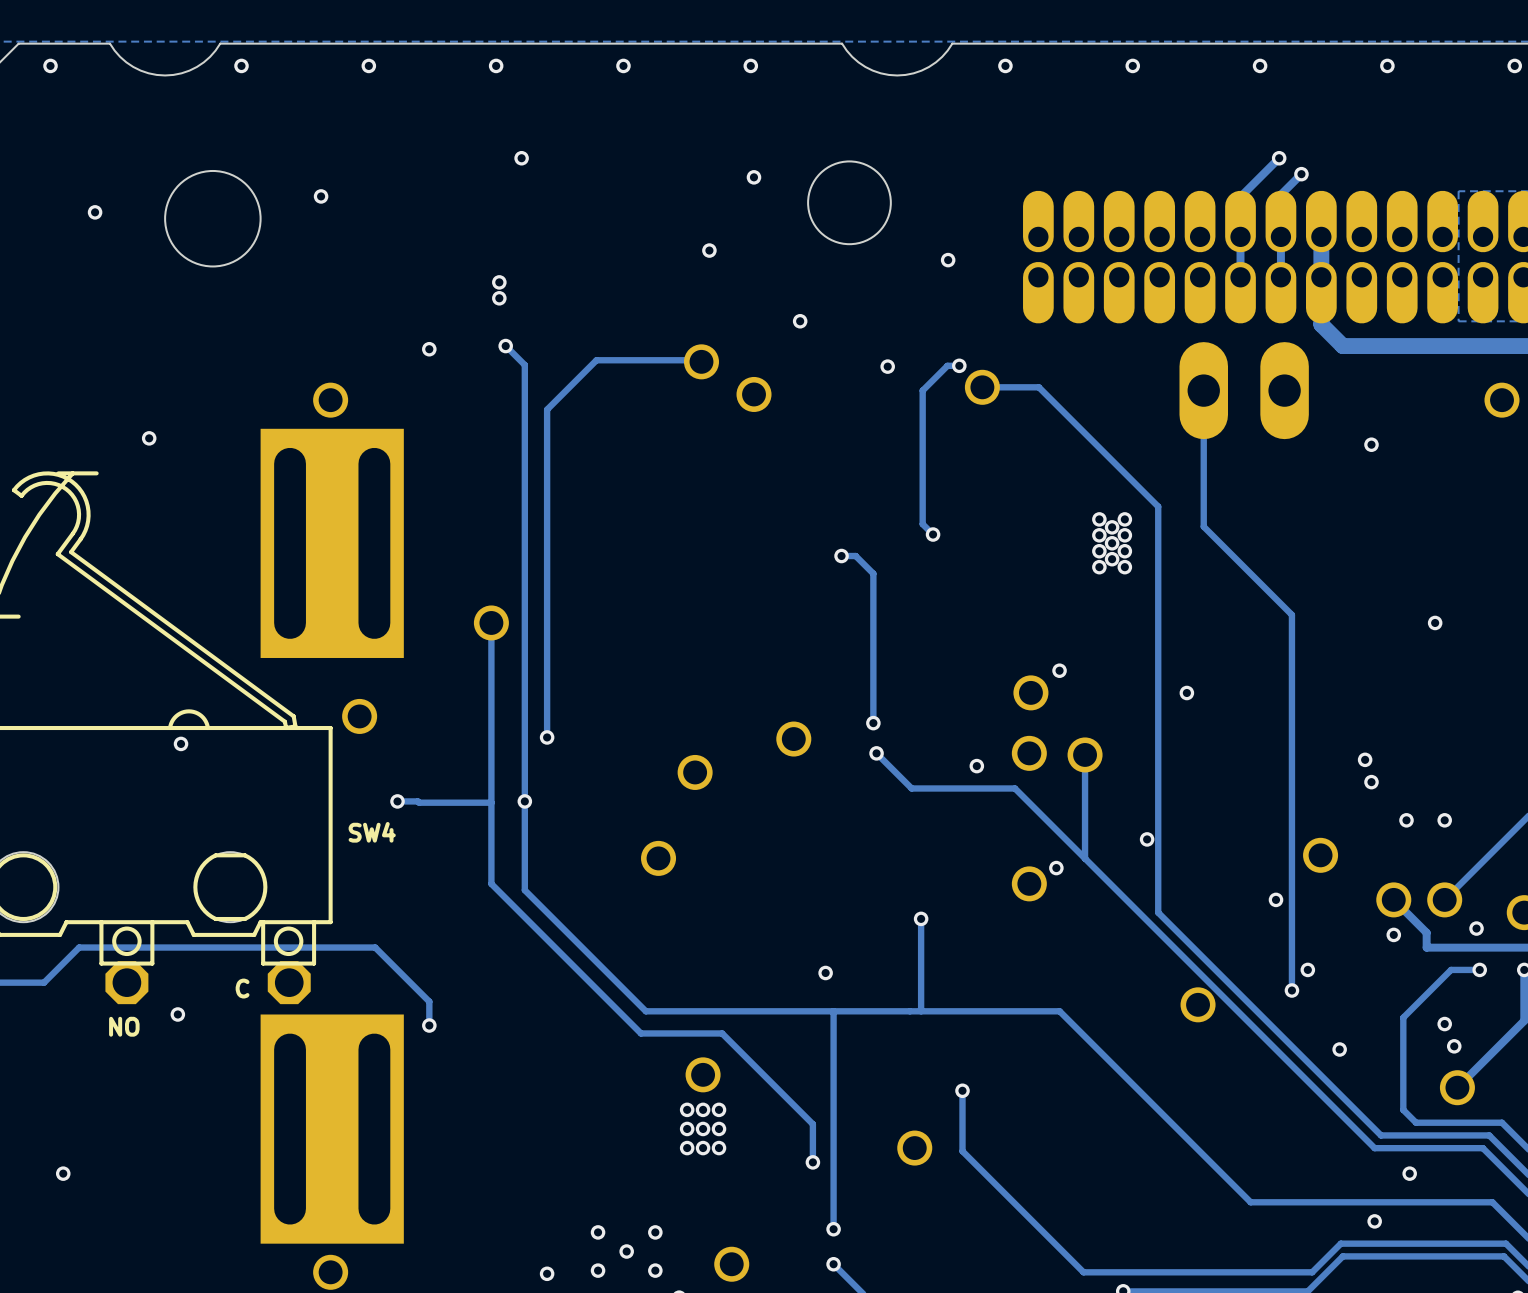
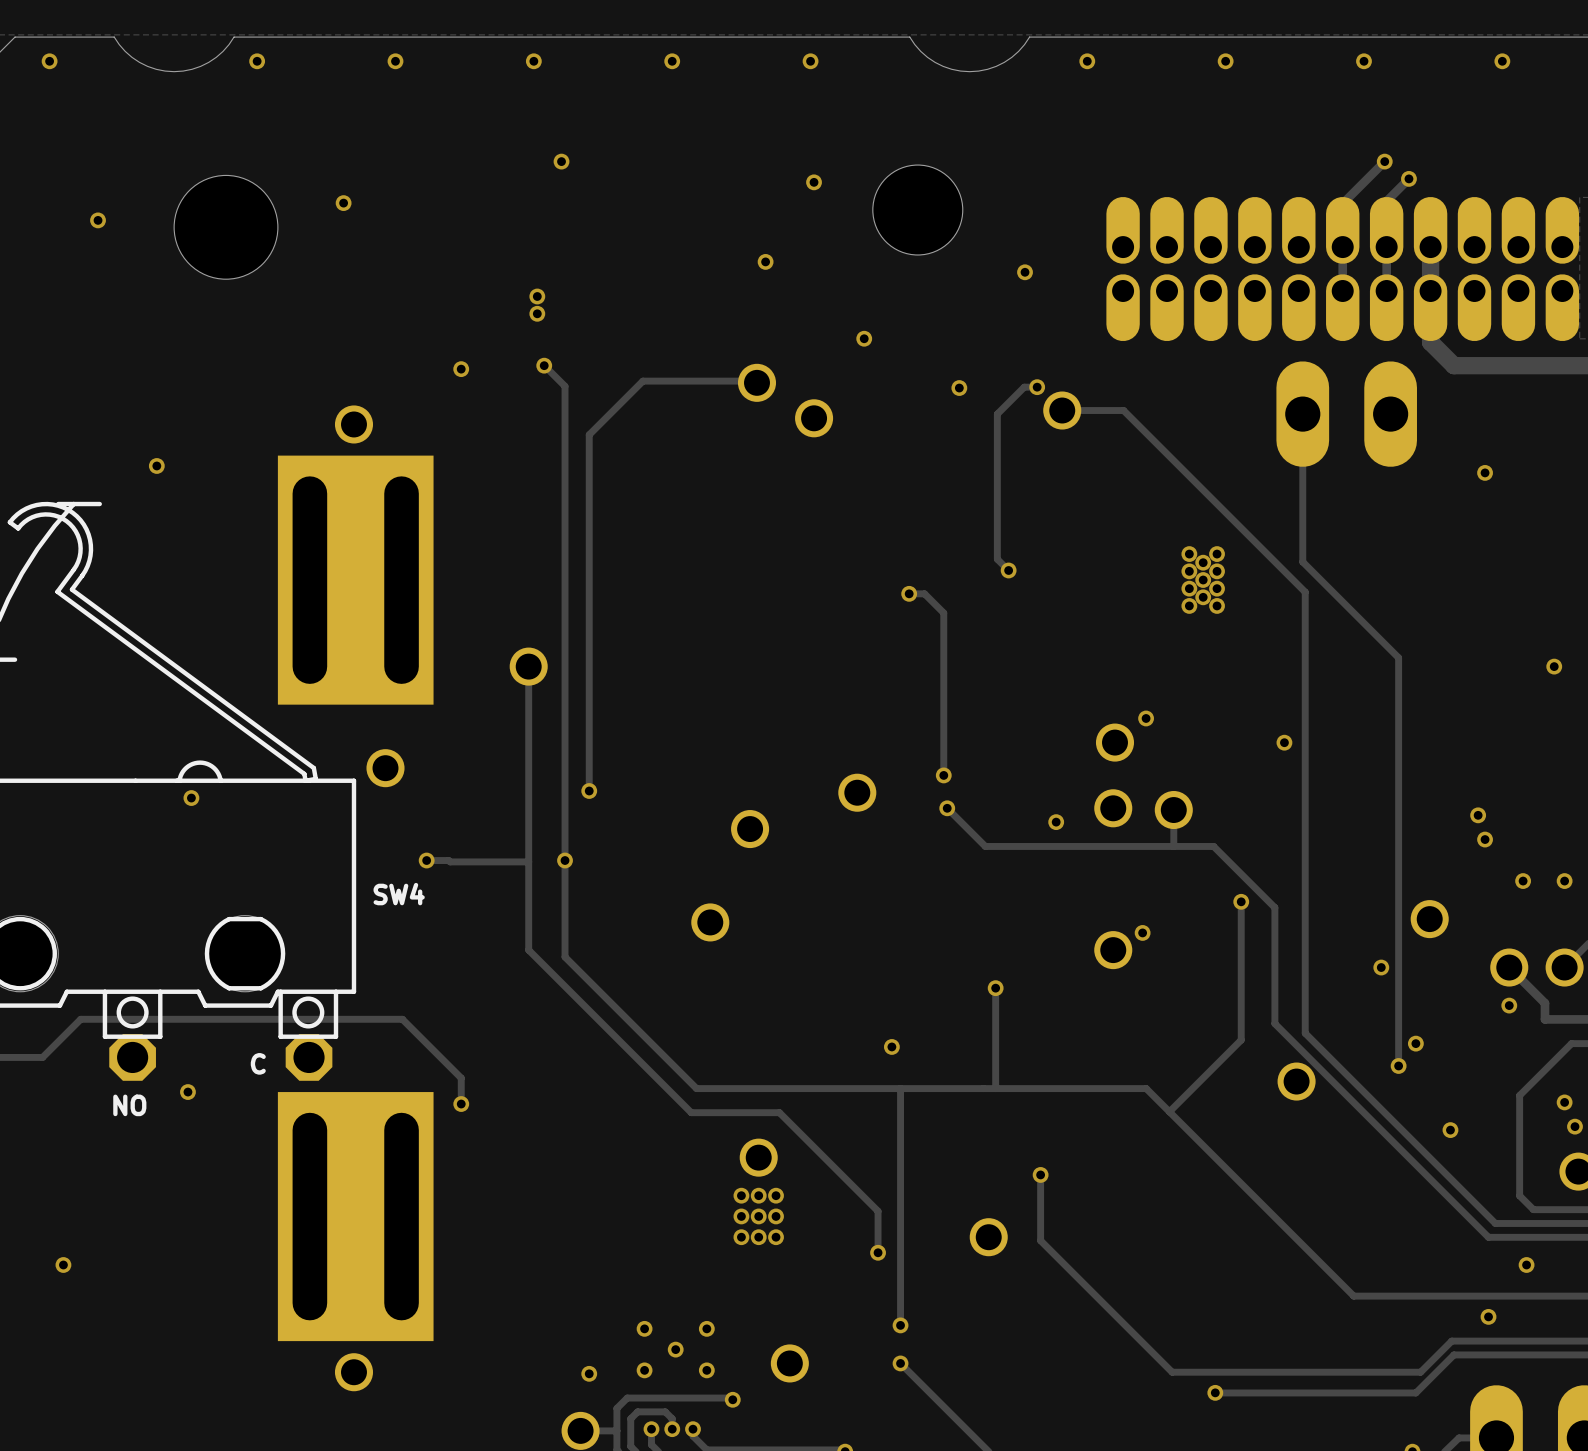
track: (1158, 506) (1158, 912) (1206, 960) -> (1253, 540) (1305, 592) (1305, 1033)
track: (1014, 788) (1178, 951) -> (1097, 846) (1213, 846) (1274, 907) (1274, 1023)
track: (1085, 788) (1085, 858) -> none
track: none -> (1241, 901) (1241, 1040) (1169, 1111)

